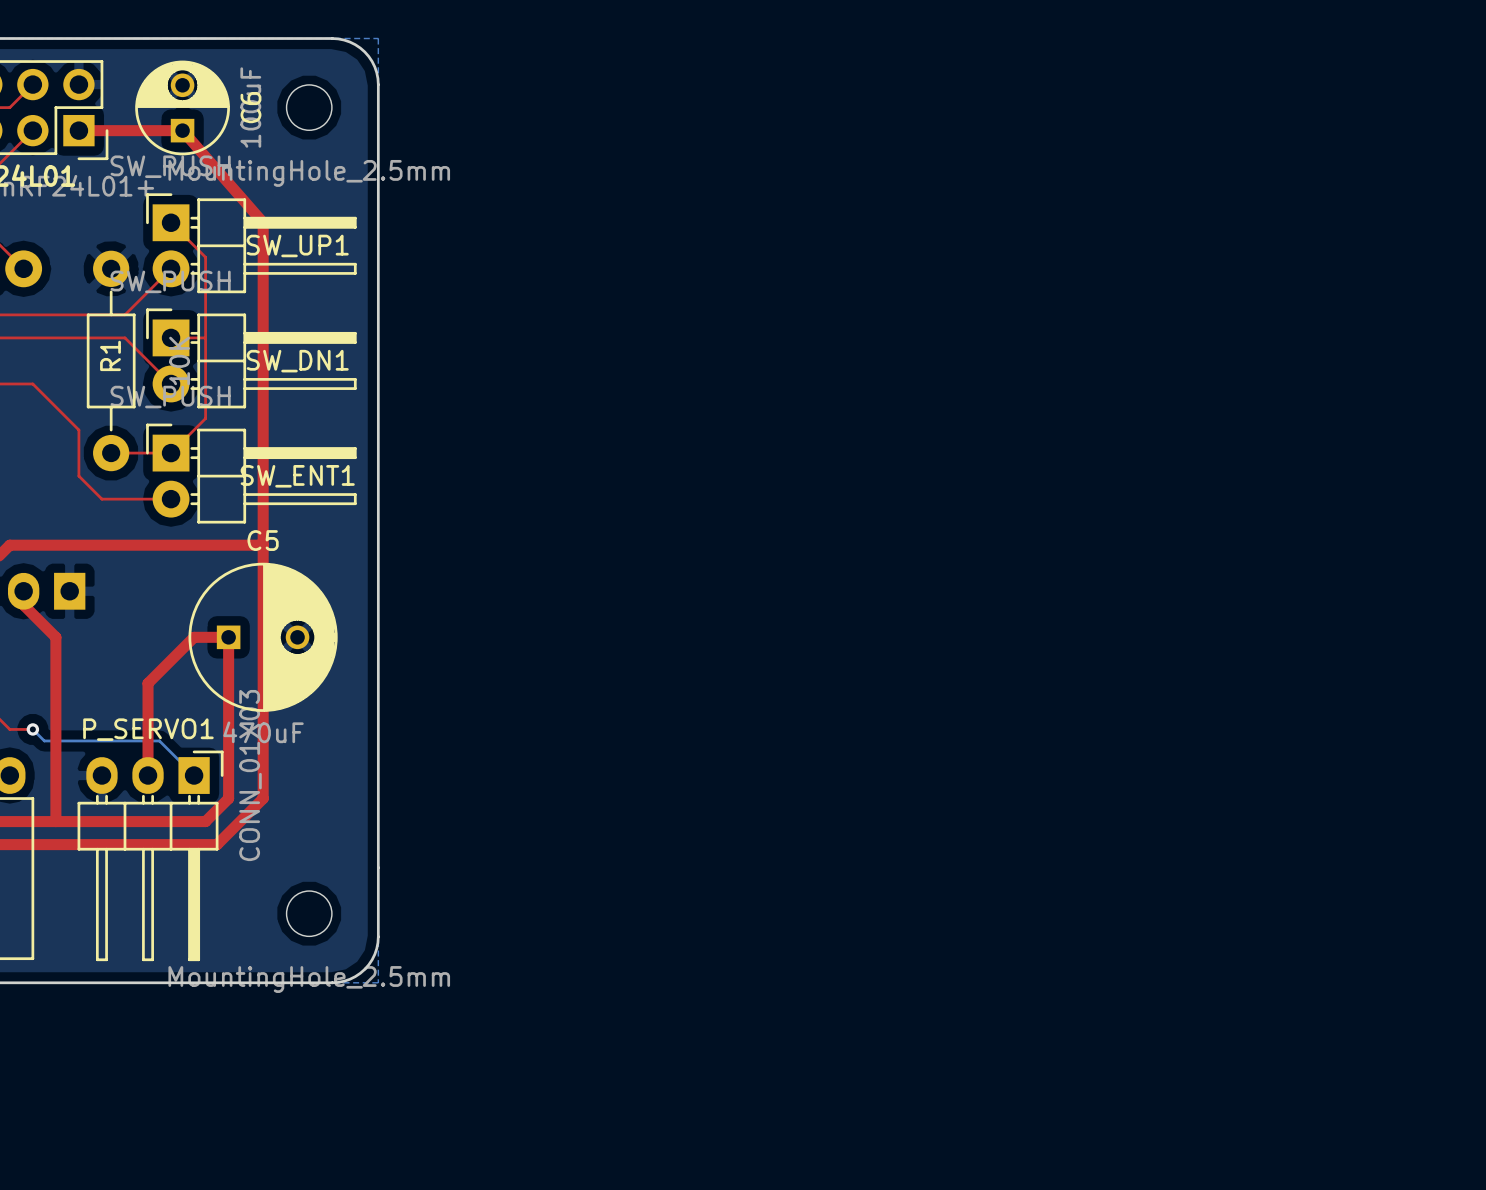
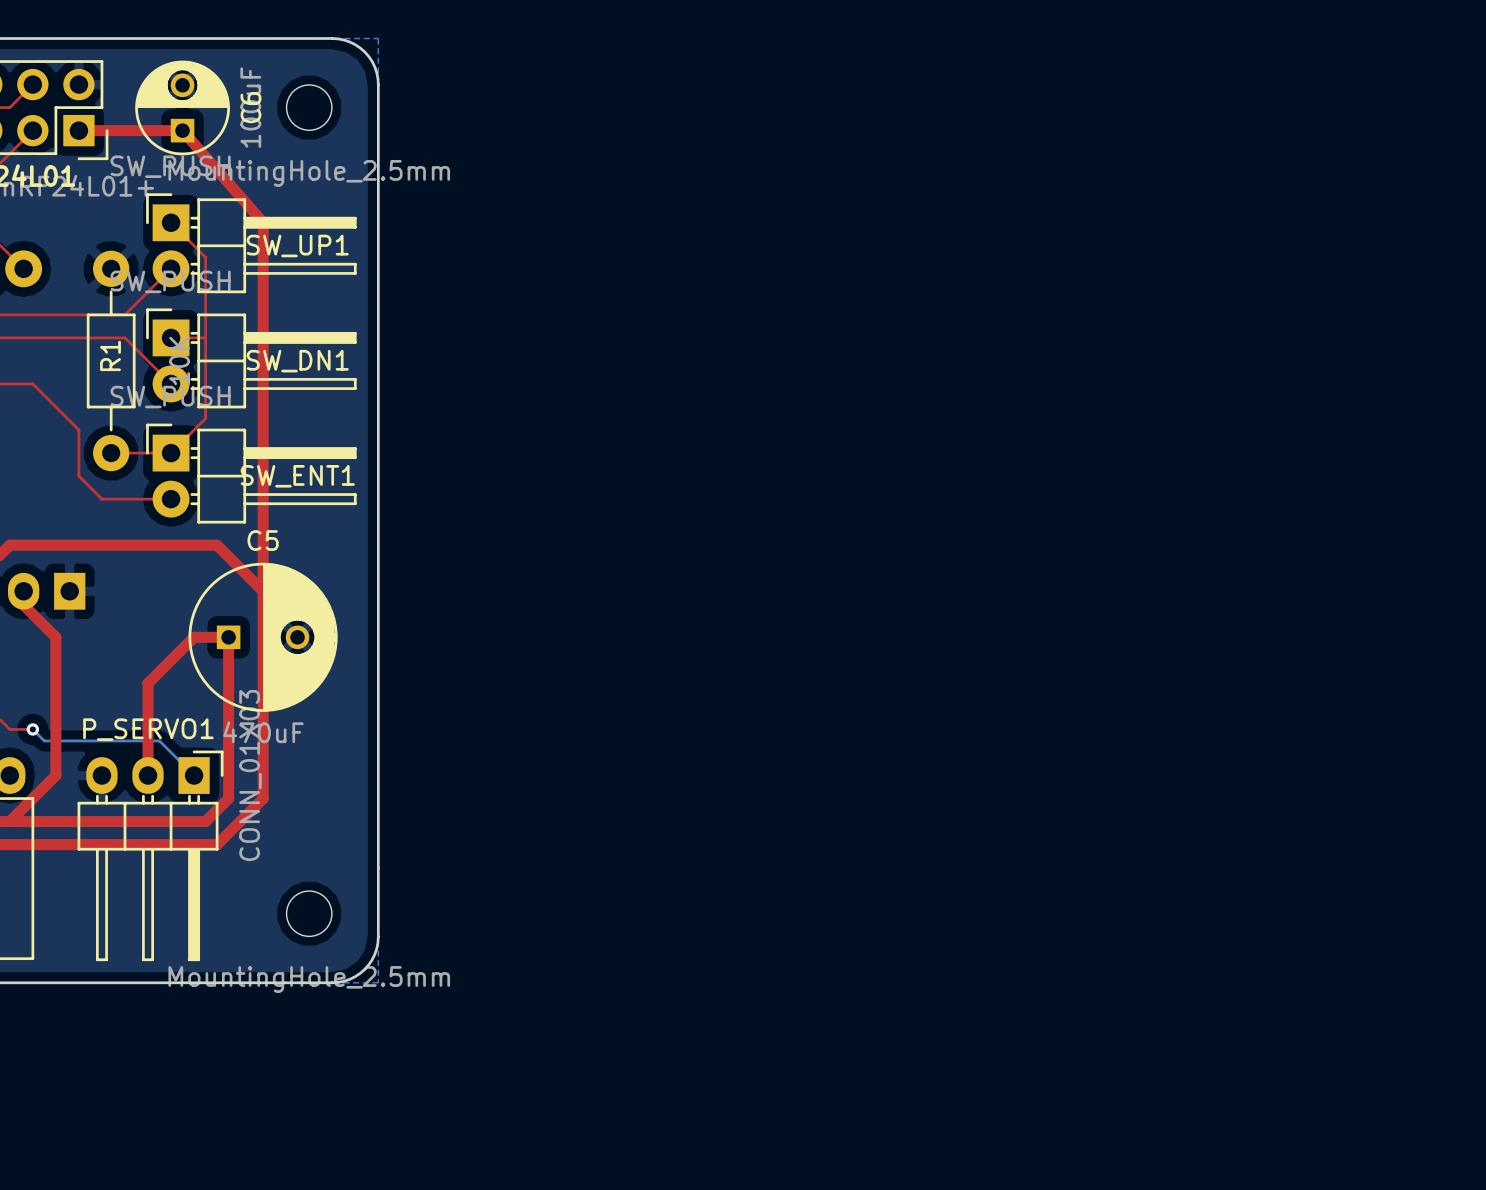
top track: (217, 545) (263, 545) -> (217, 545) (263, 591)
top track: (55, 775) (55, 821) -> (55, 775) (9, 821)

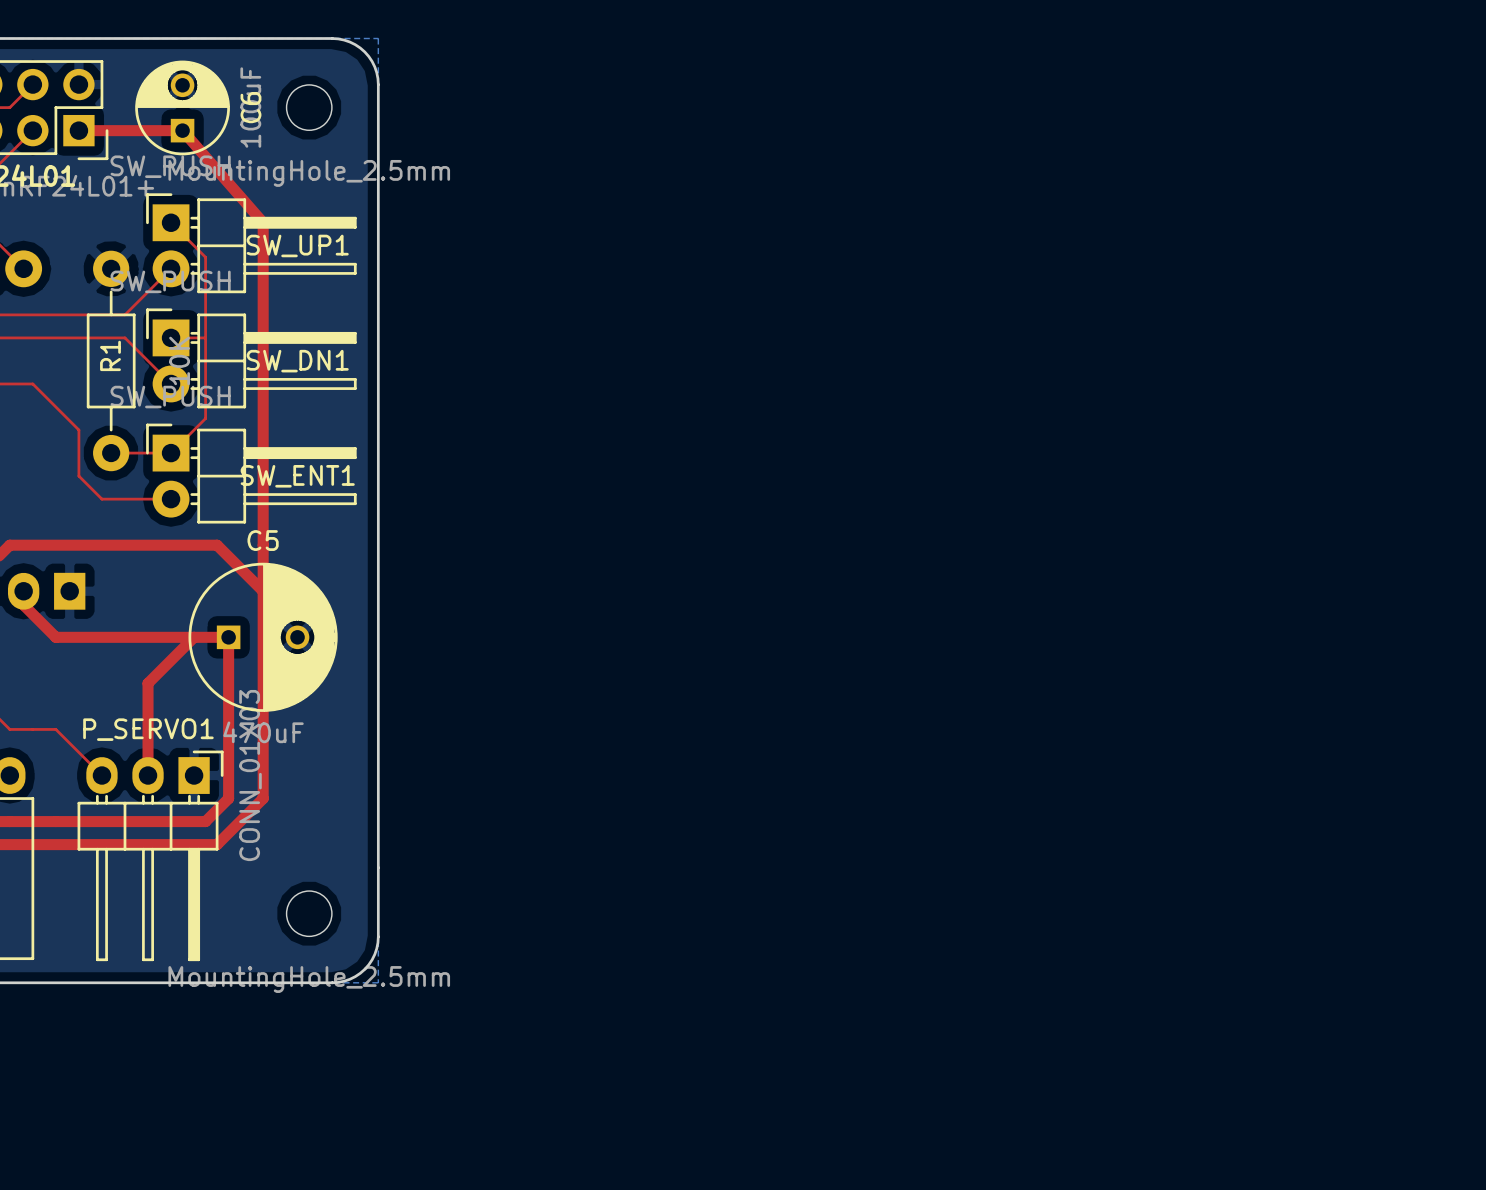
top track: (55, 637) (55, 775) (9, 821) -> (55, 637) (194, 637)
top track: none -> (32, 729) (55, 729) (101, 775)
bottom track: (32, 729) (44, 740) (159, 740) (194, 775) -> none
via: (32, 729) -> none

